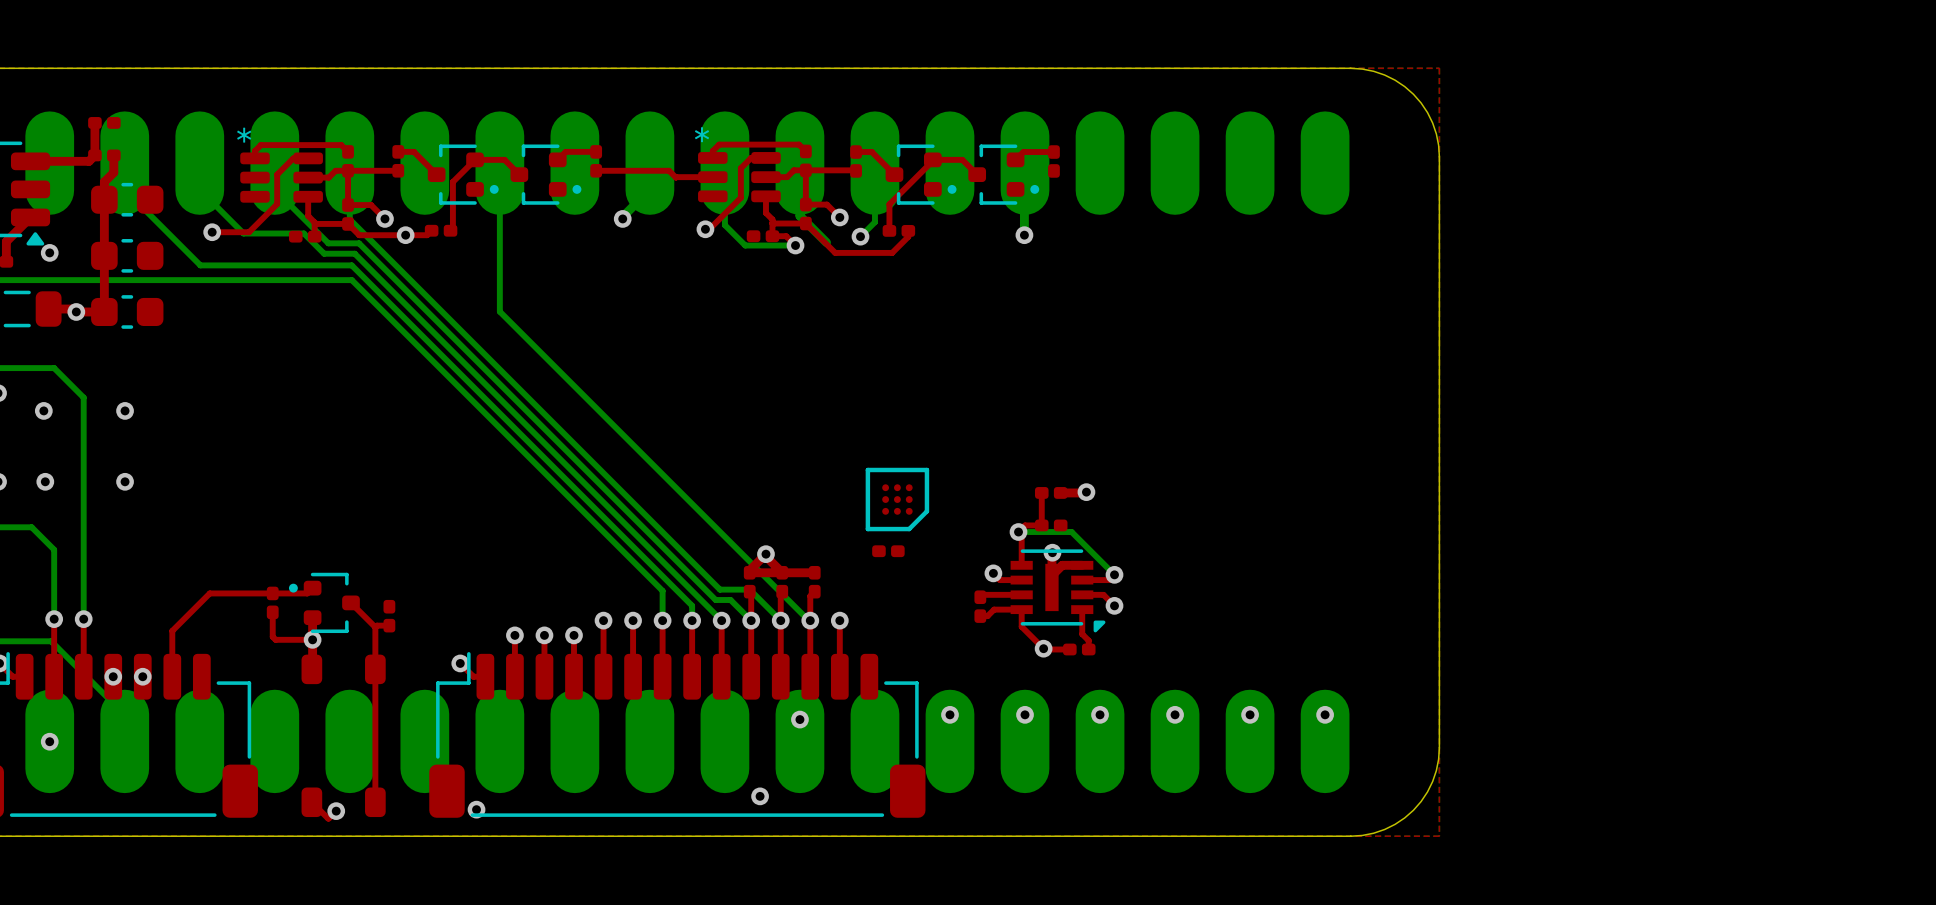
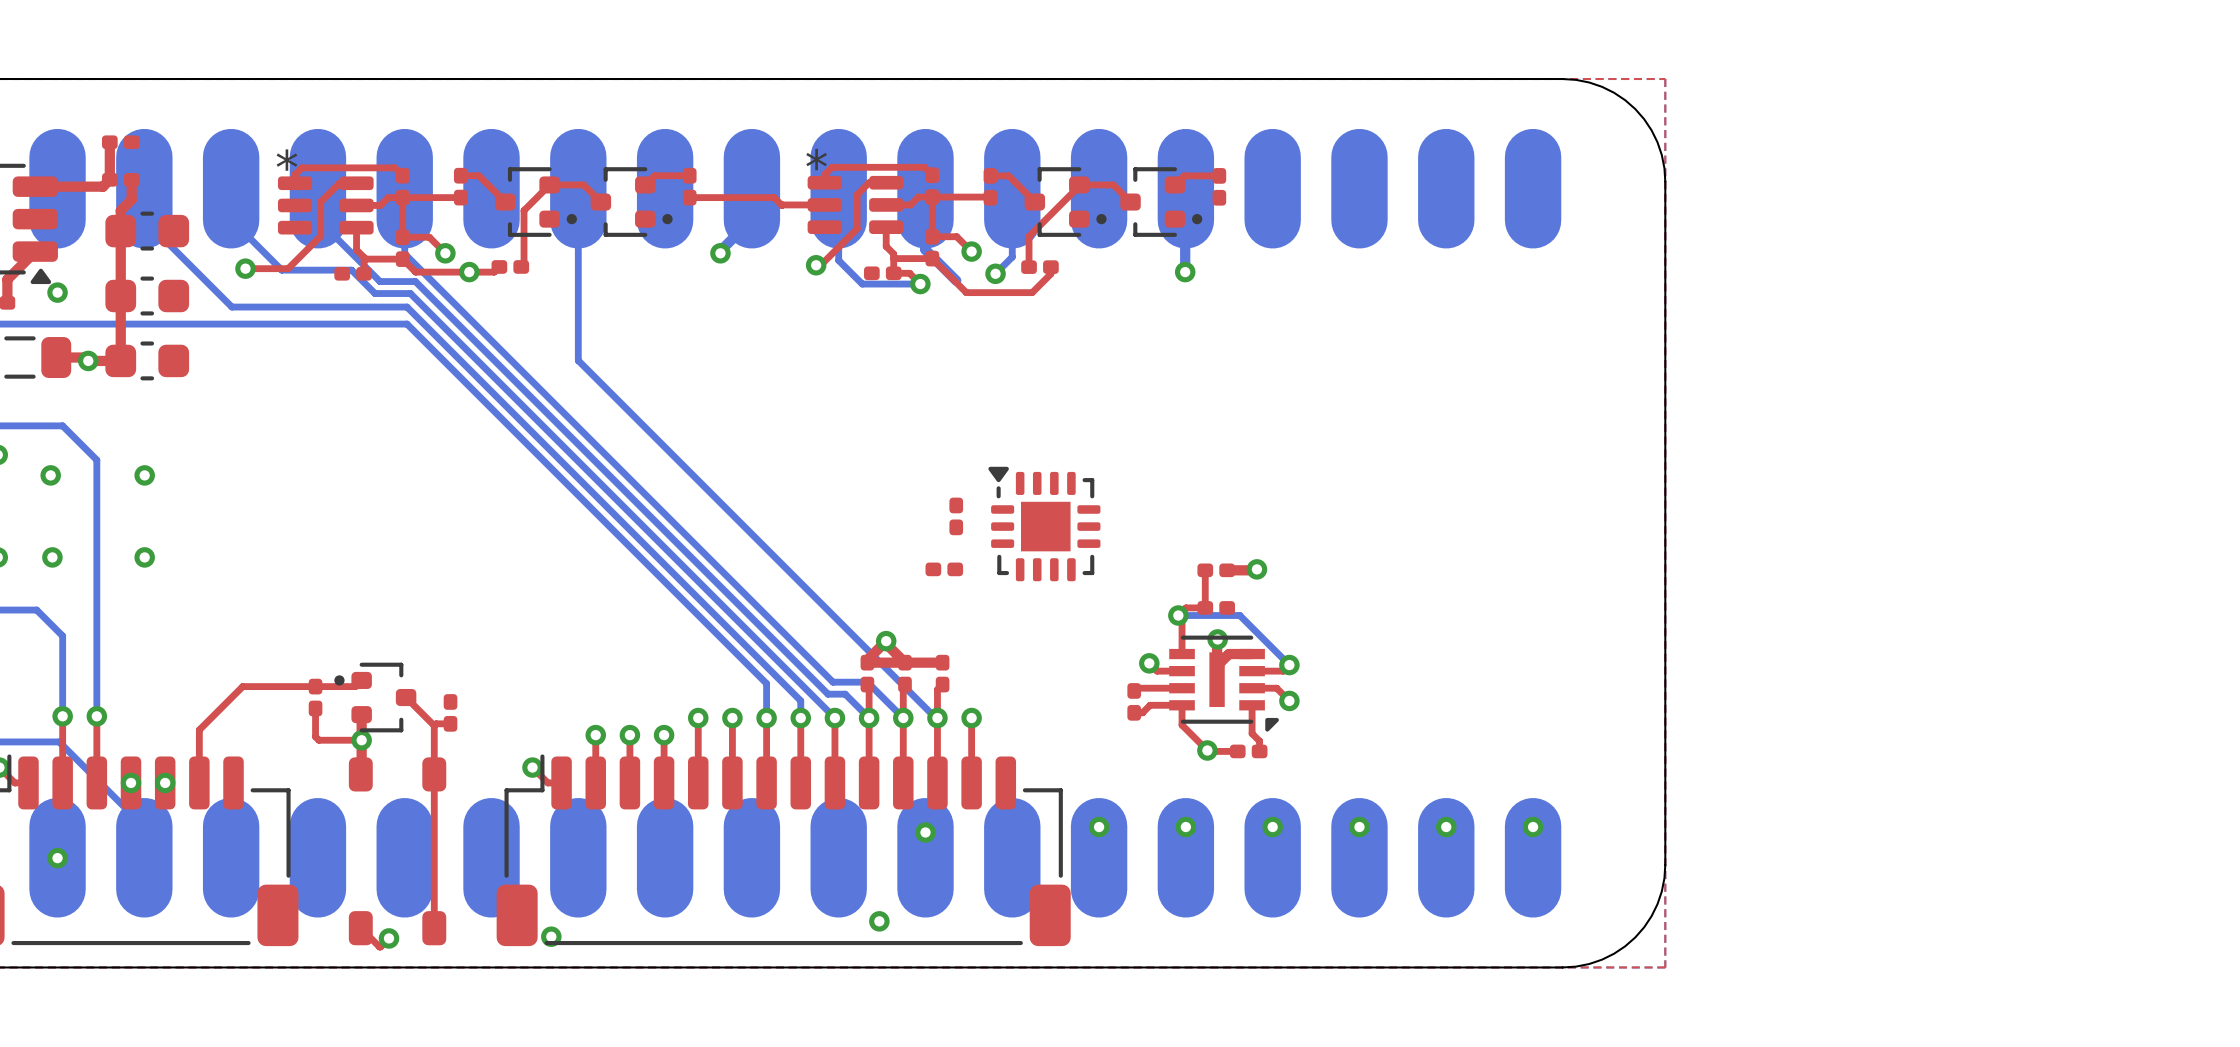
part: none -> (956, 516)
part: none -> (1044, 524)
part: none -> (944, 569)
part: (897, 499) -> none
part: (888, 551) -> none

